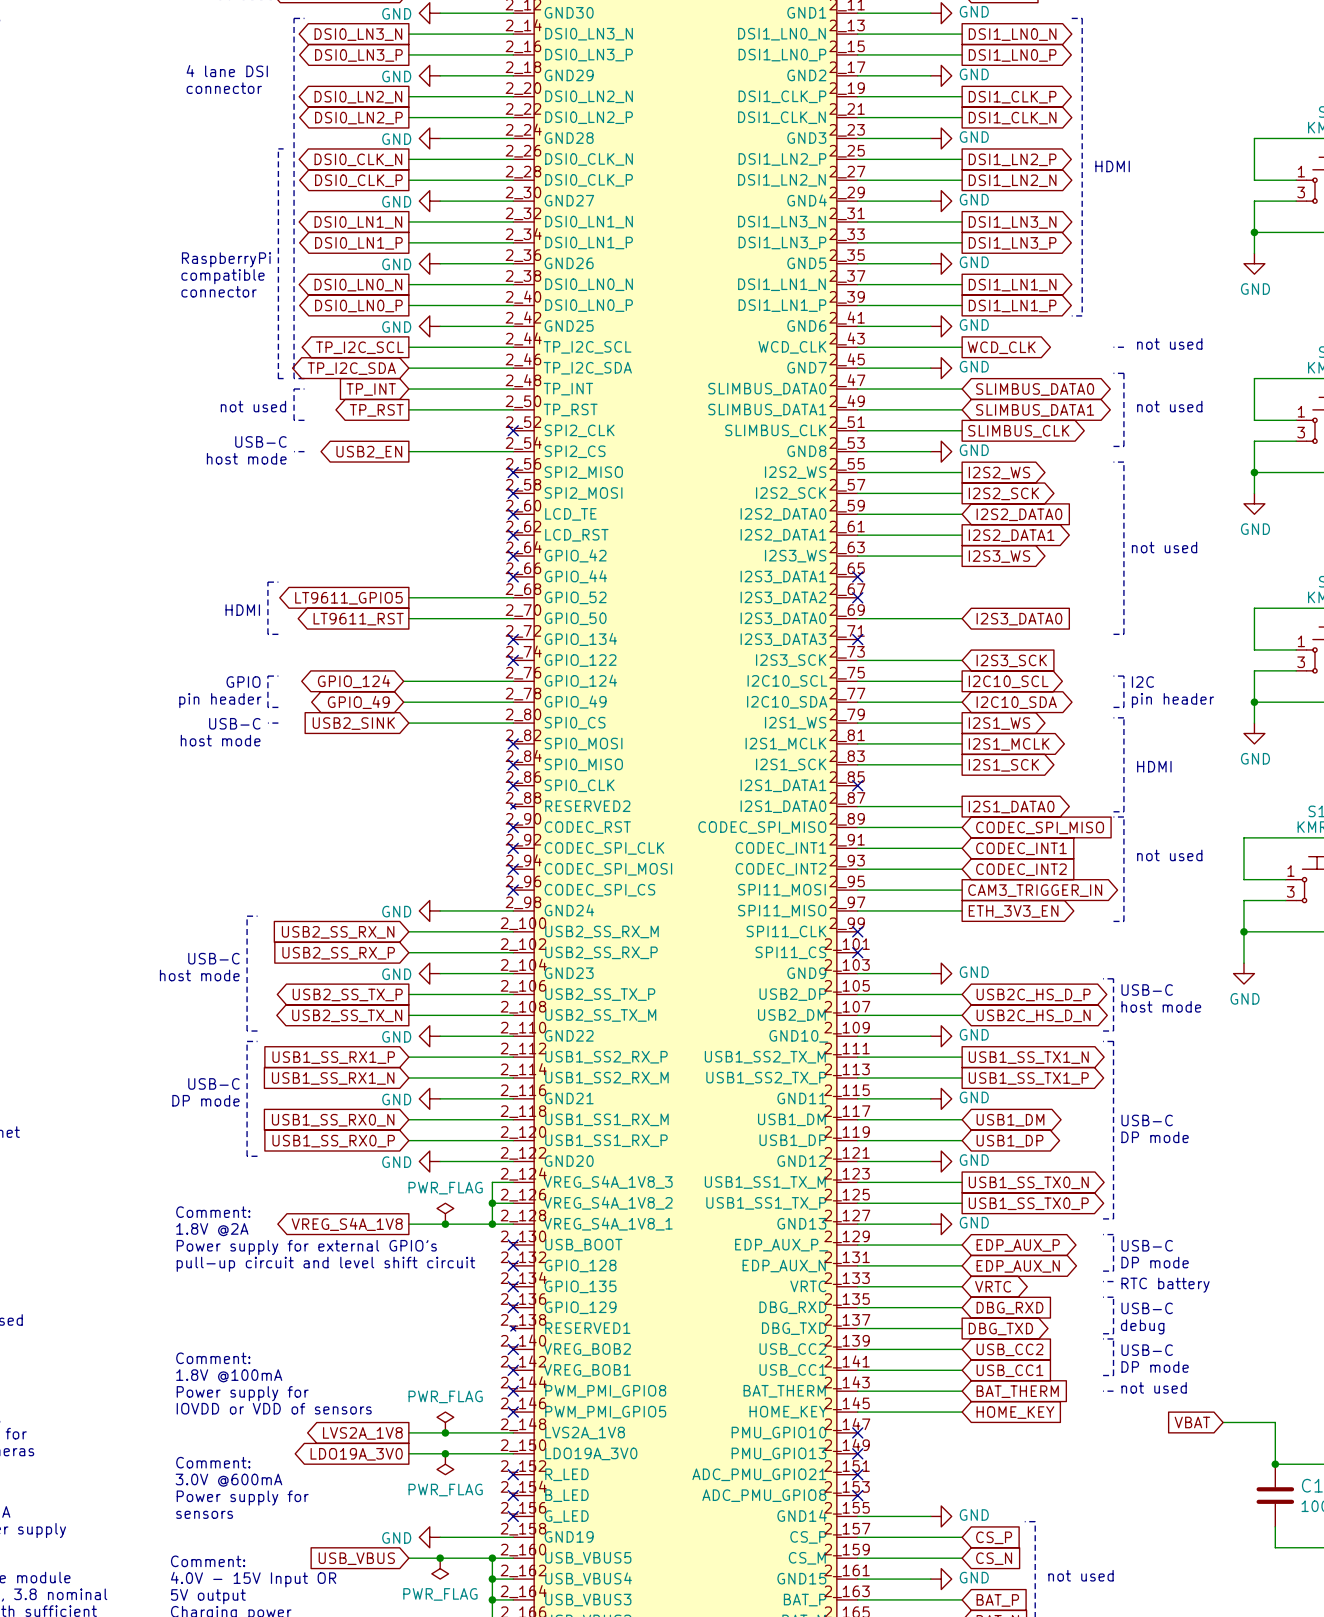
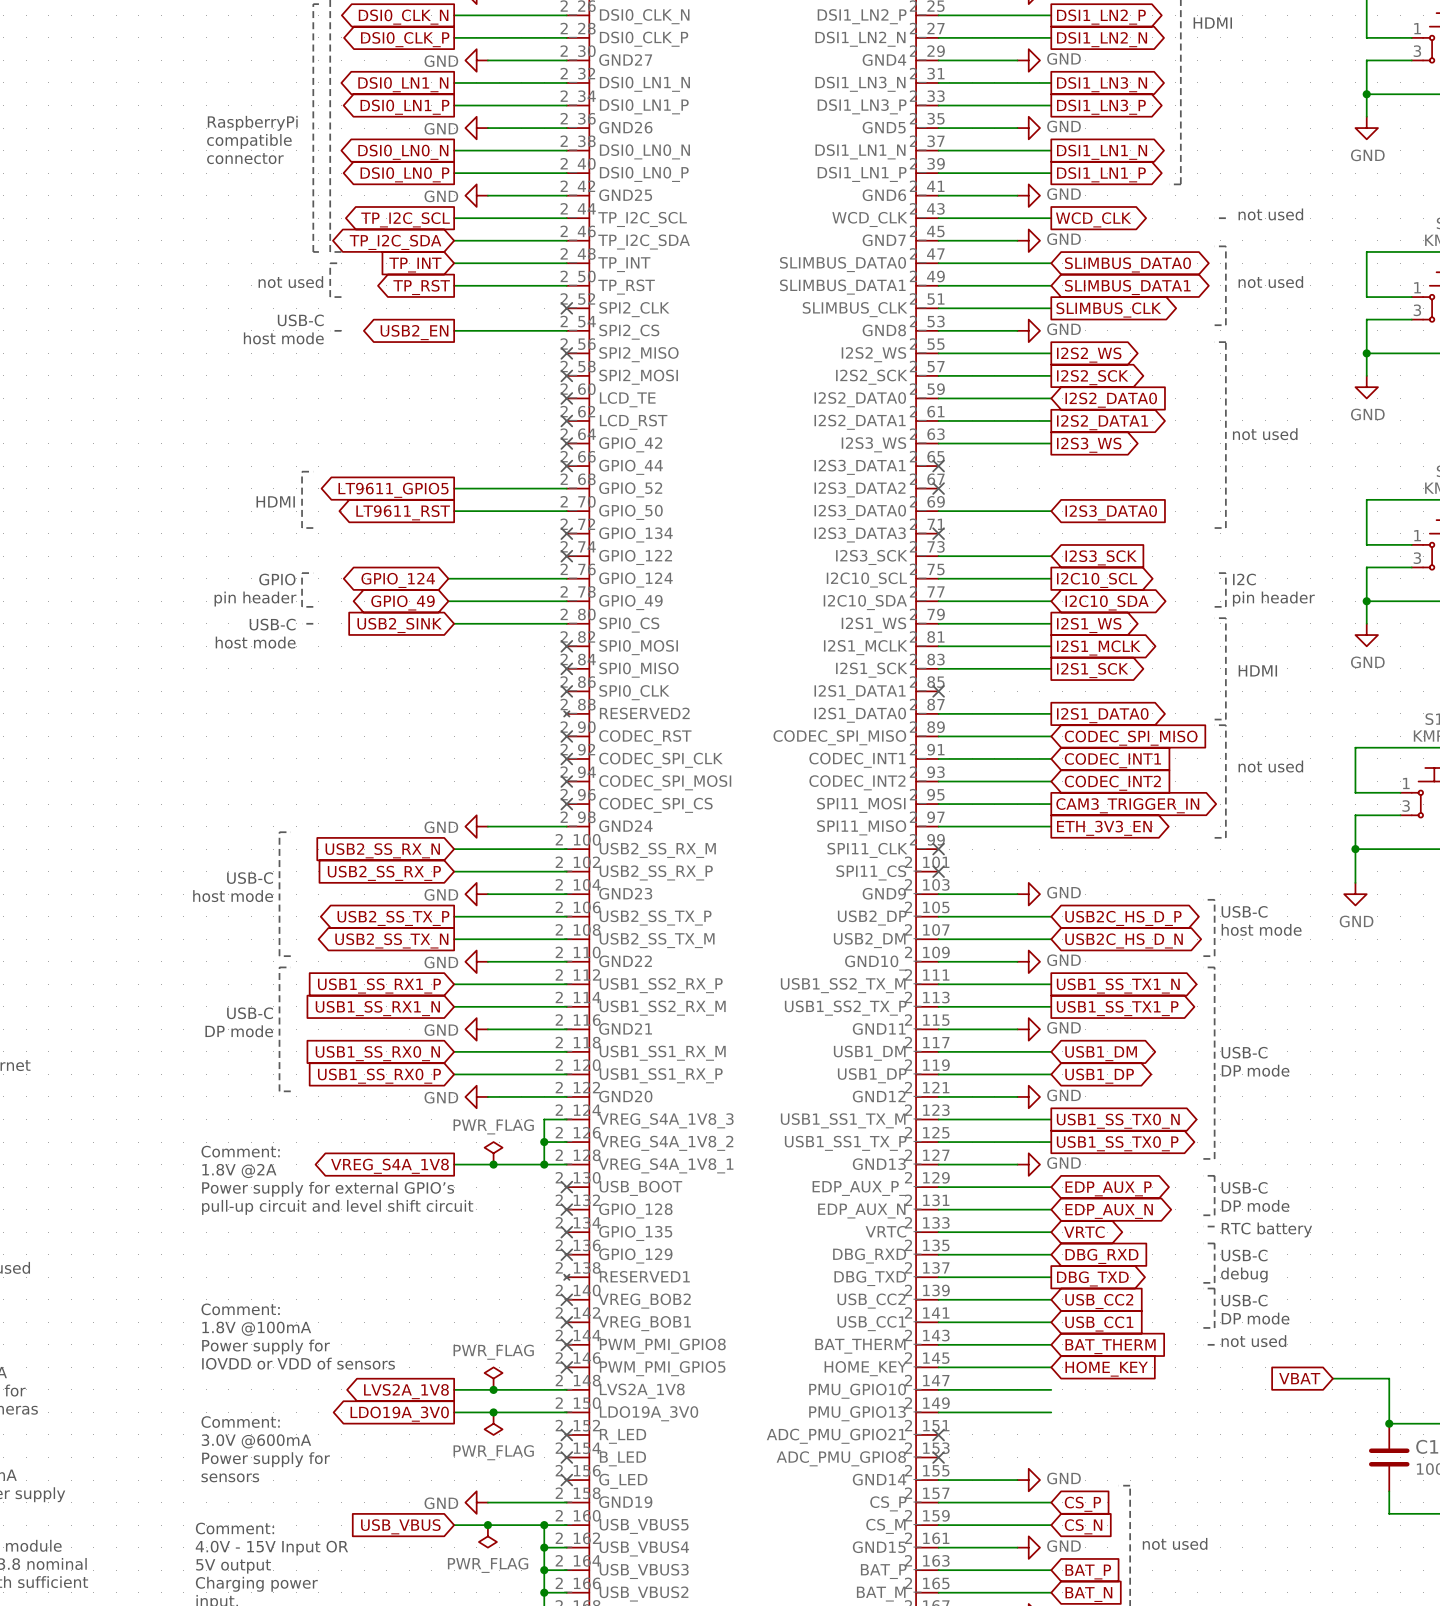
wire: none -> (938, 1389) (1051, 1389)
no-connect mark: (857, 1432) -> none
wire: none -> (938, 1412) (1051, 1412)
no-connect mark: (857, 1453) -> none

